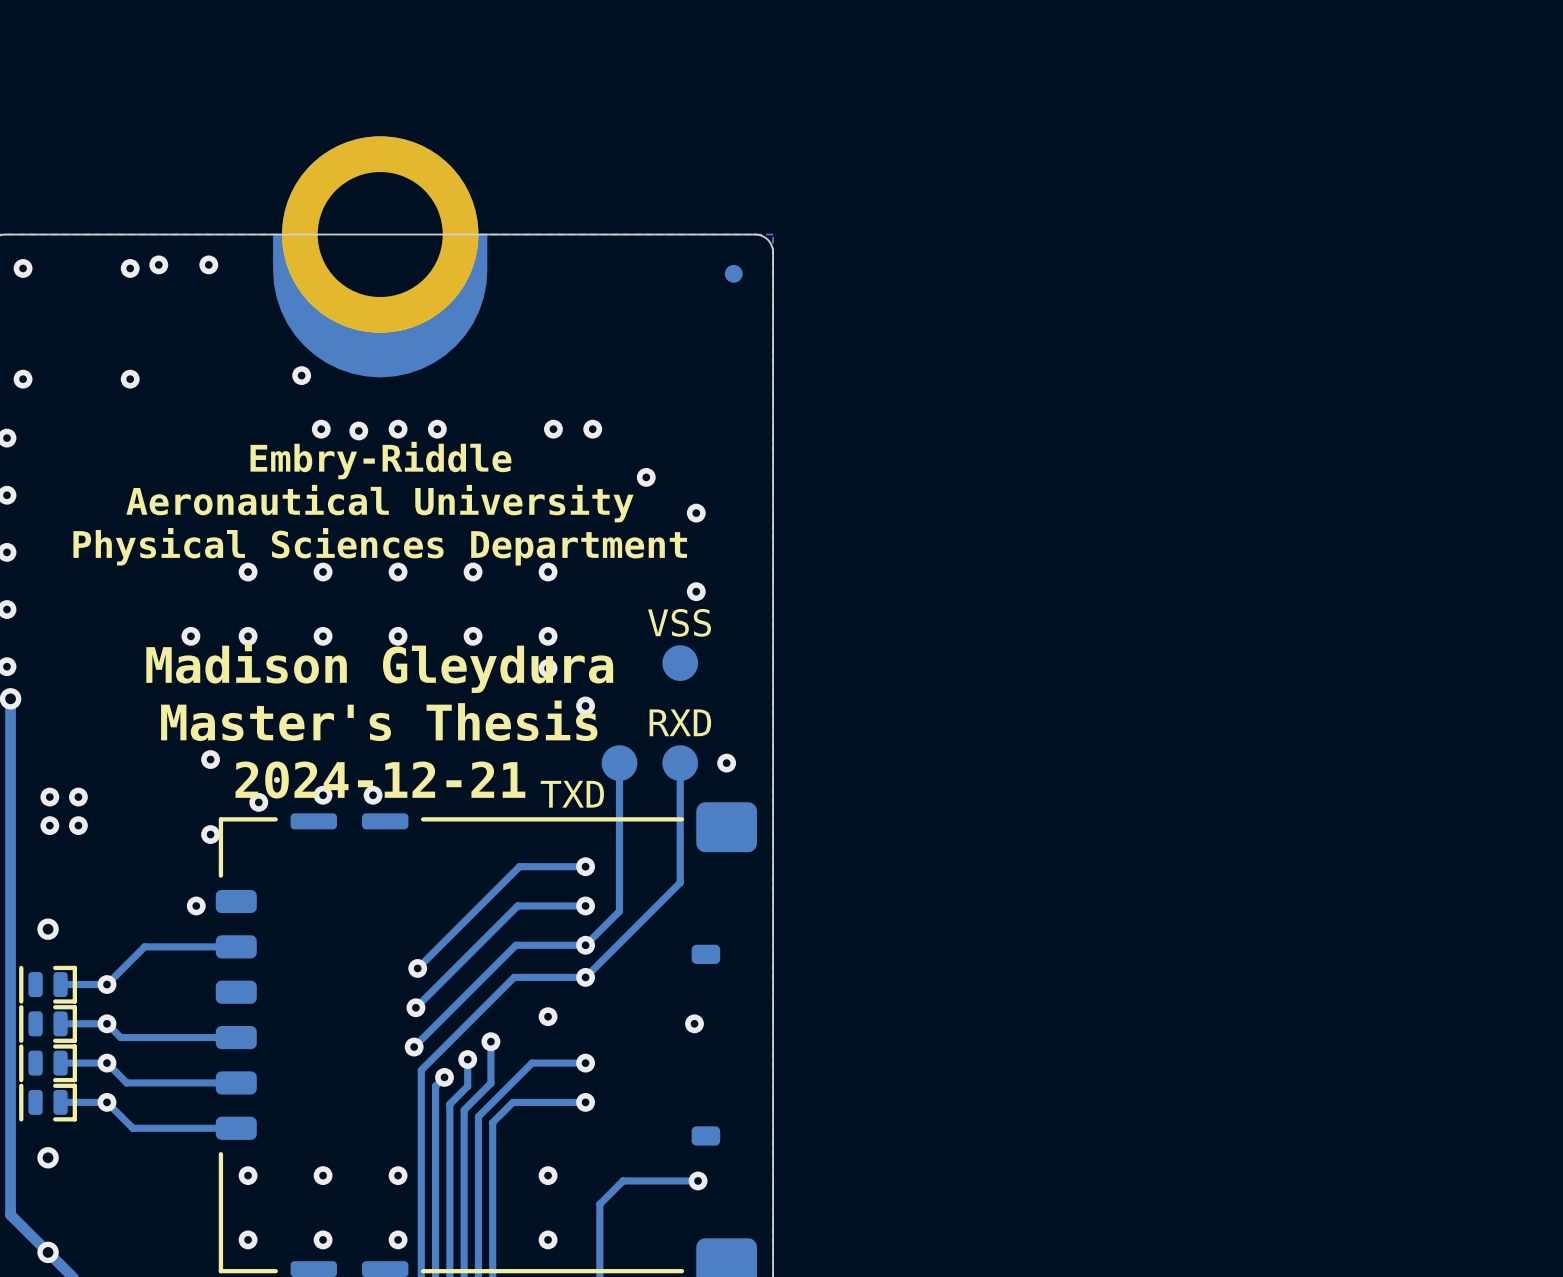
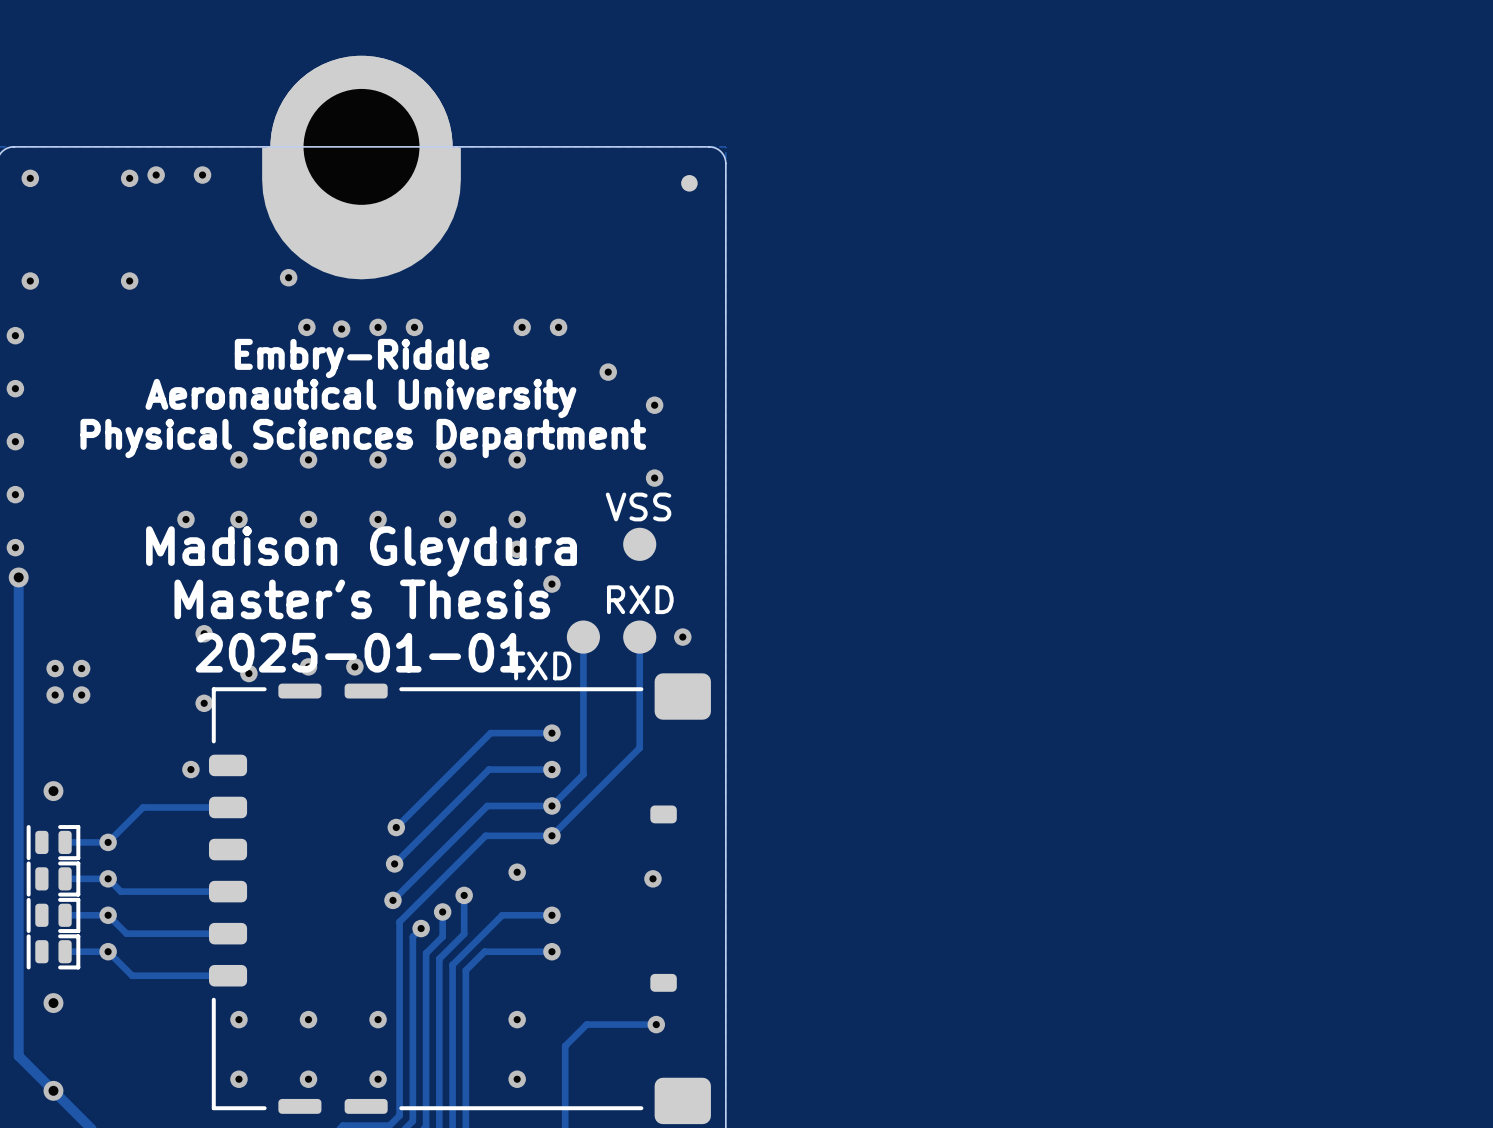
text: 2024-12-21 (380, 780) -> 2025-01-01 (360, 652)

